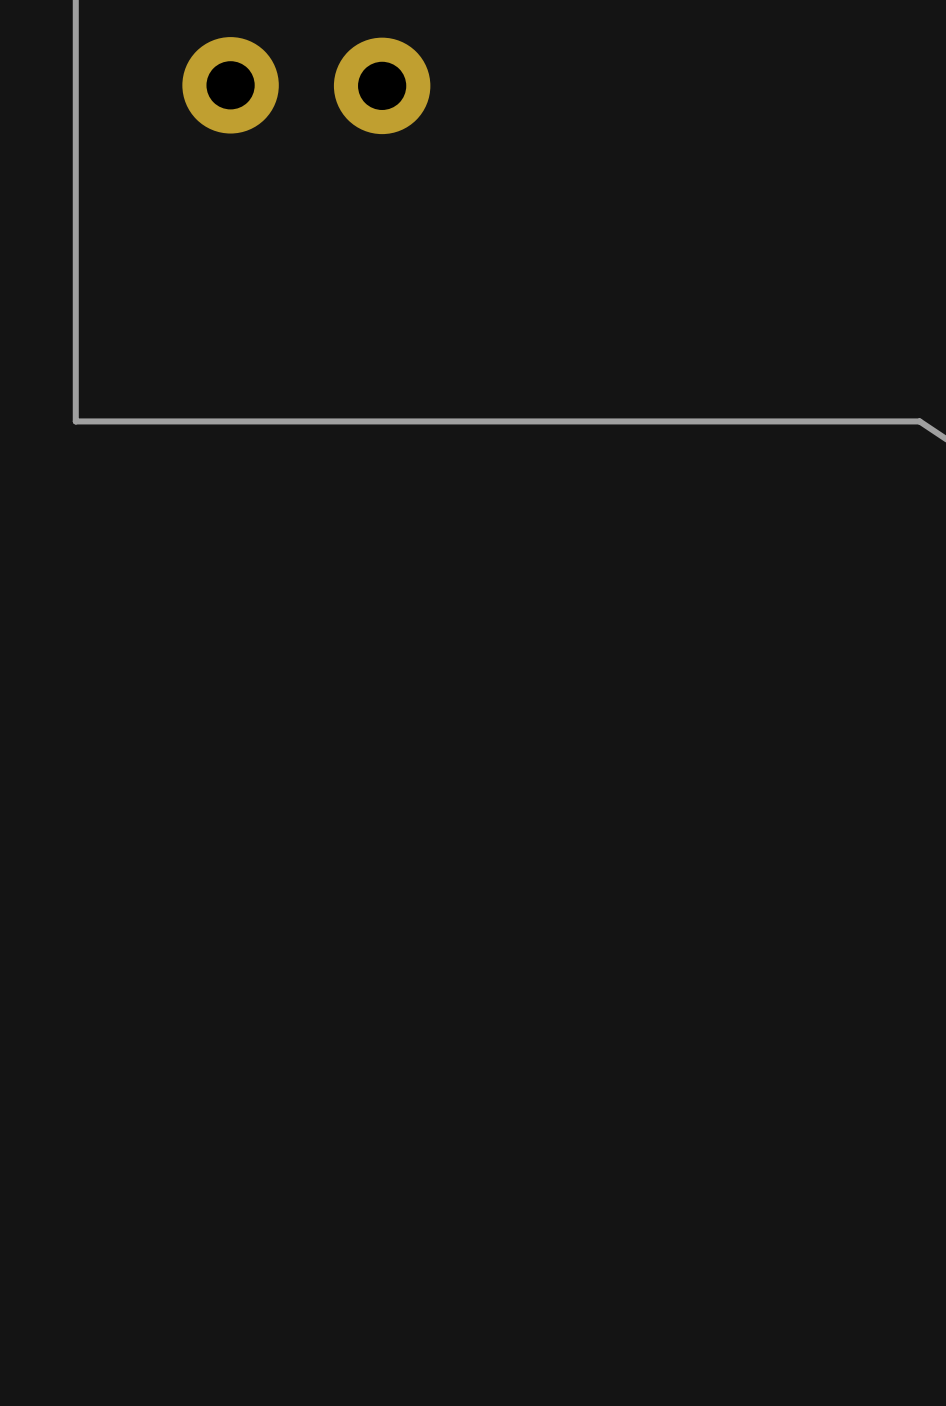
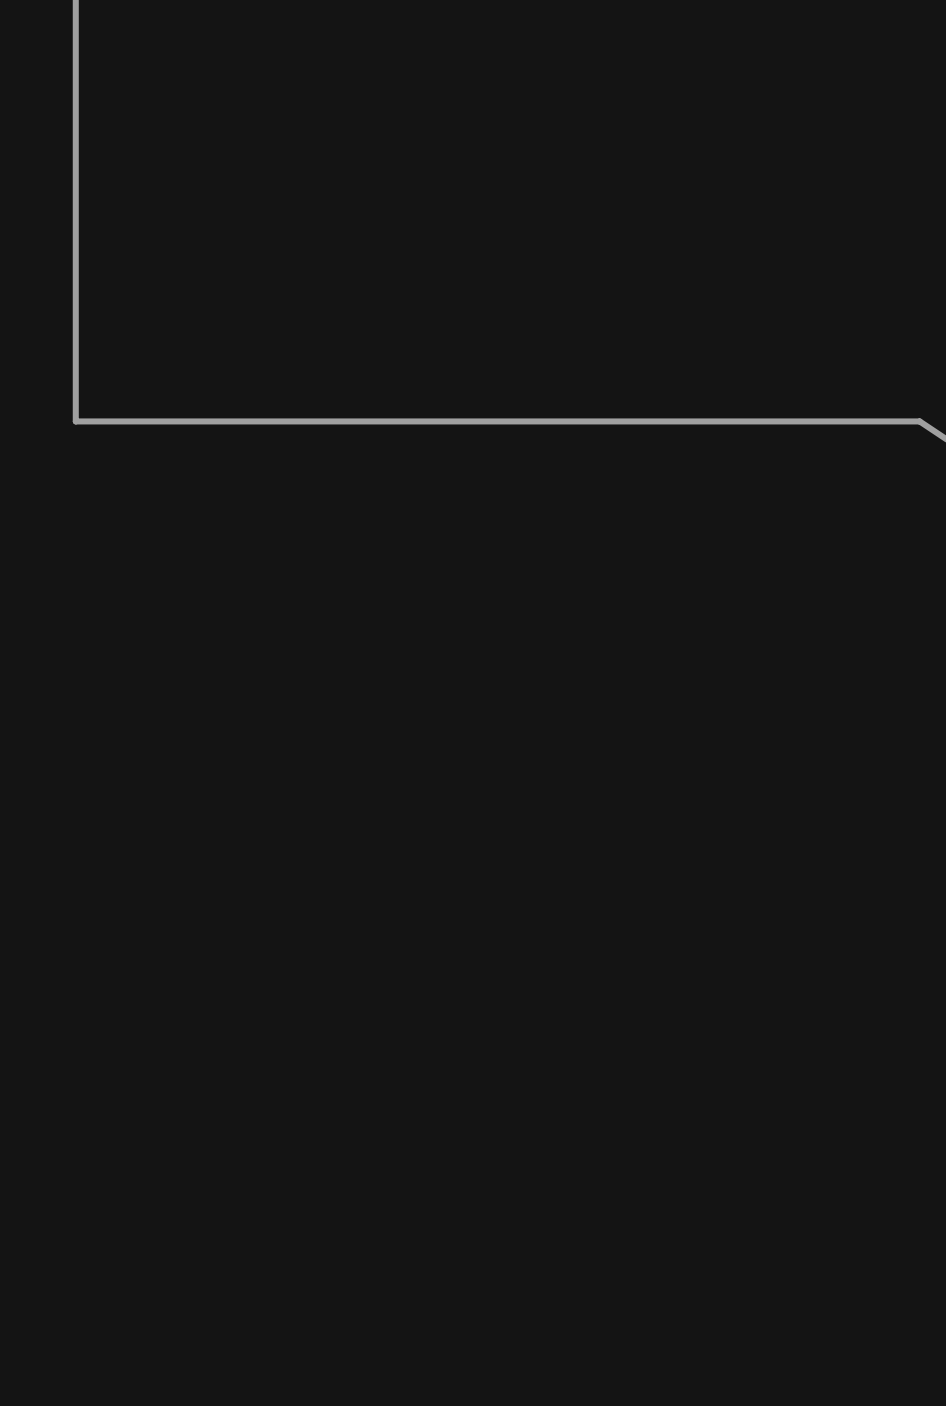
via: (230, 85) -> none
via: (382, 85) -> none

